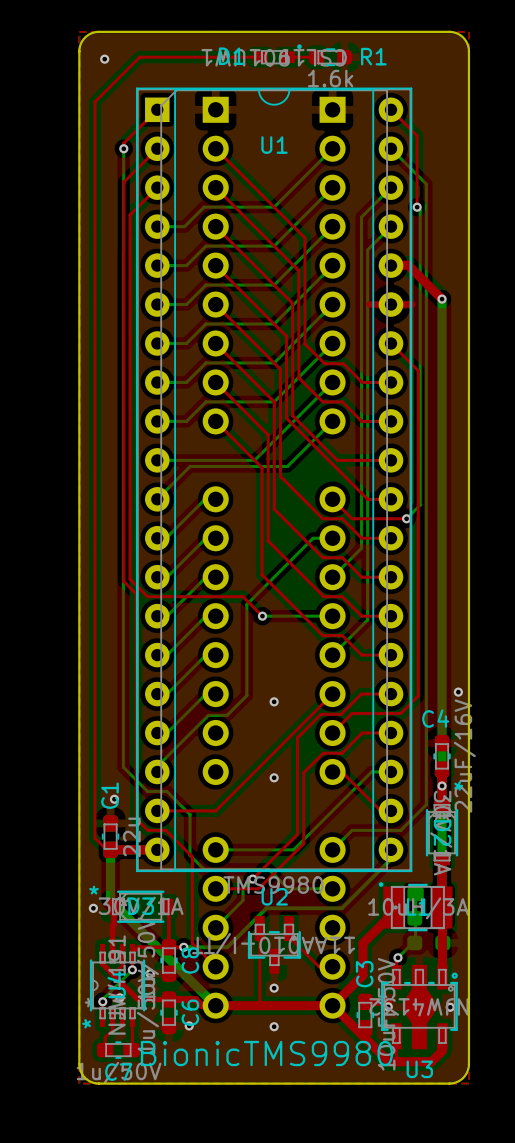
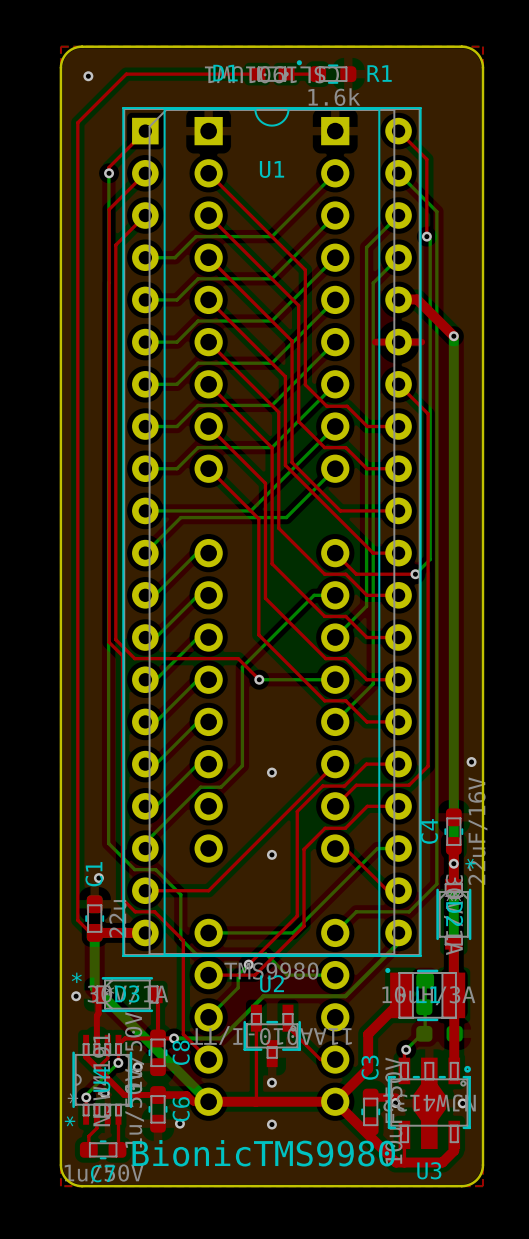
C4 name rotation: 0° (435, 718) -> 90° counterclockwise (429, 831)
C4 name position: C4 (435, 718) -> C4 (429, 831)

